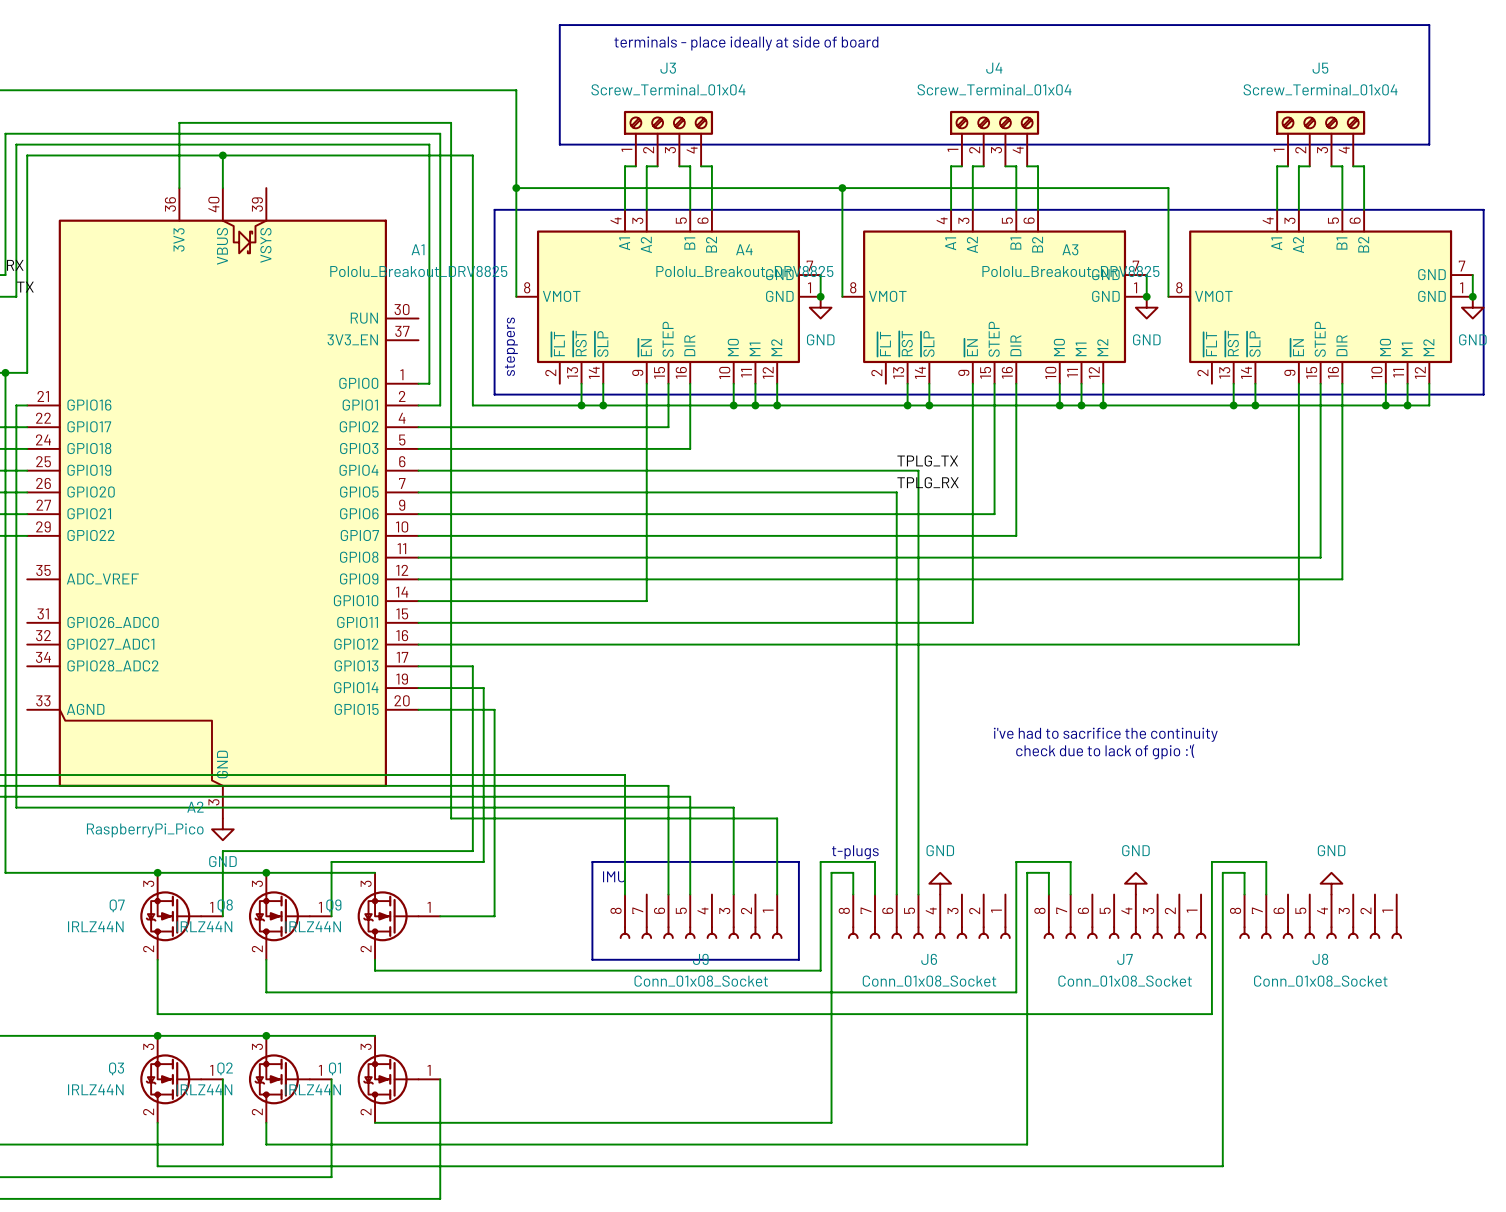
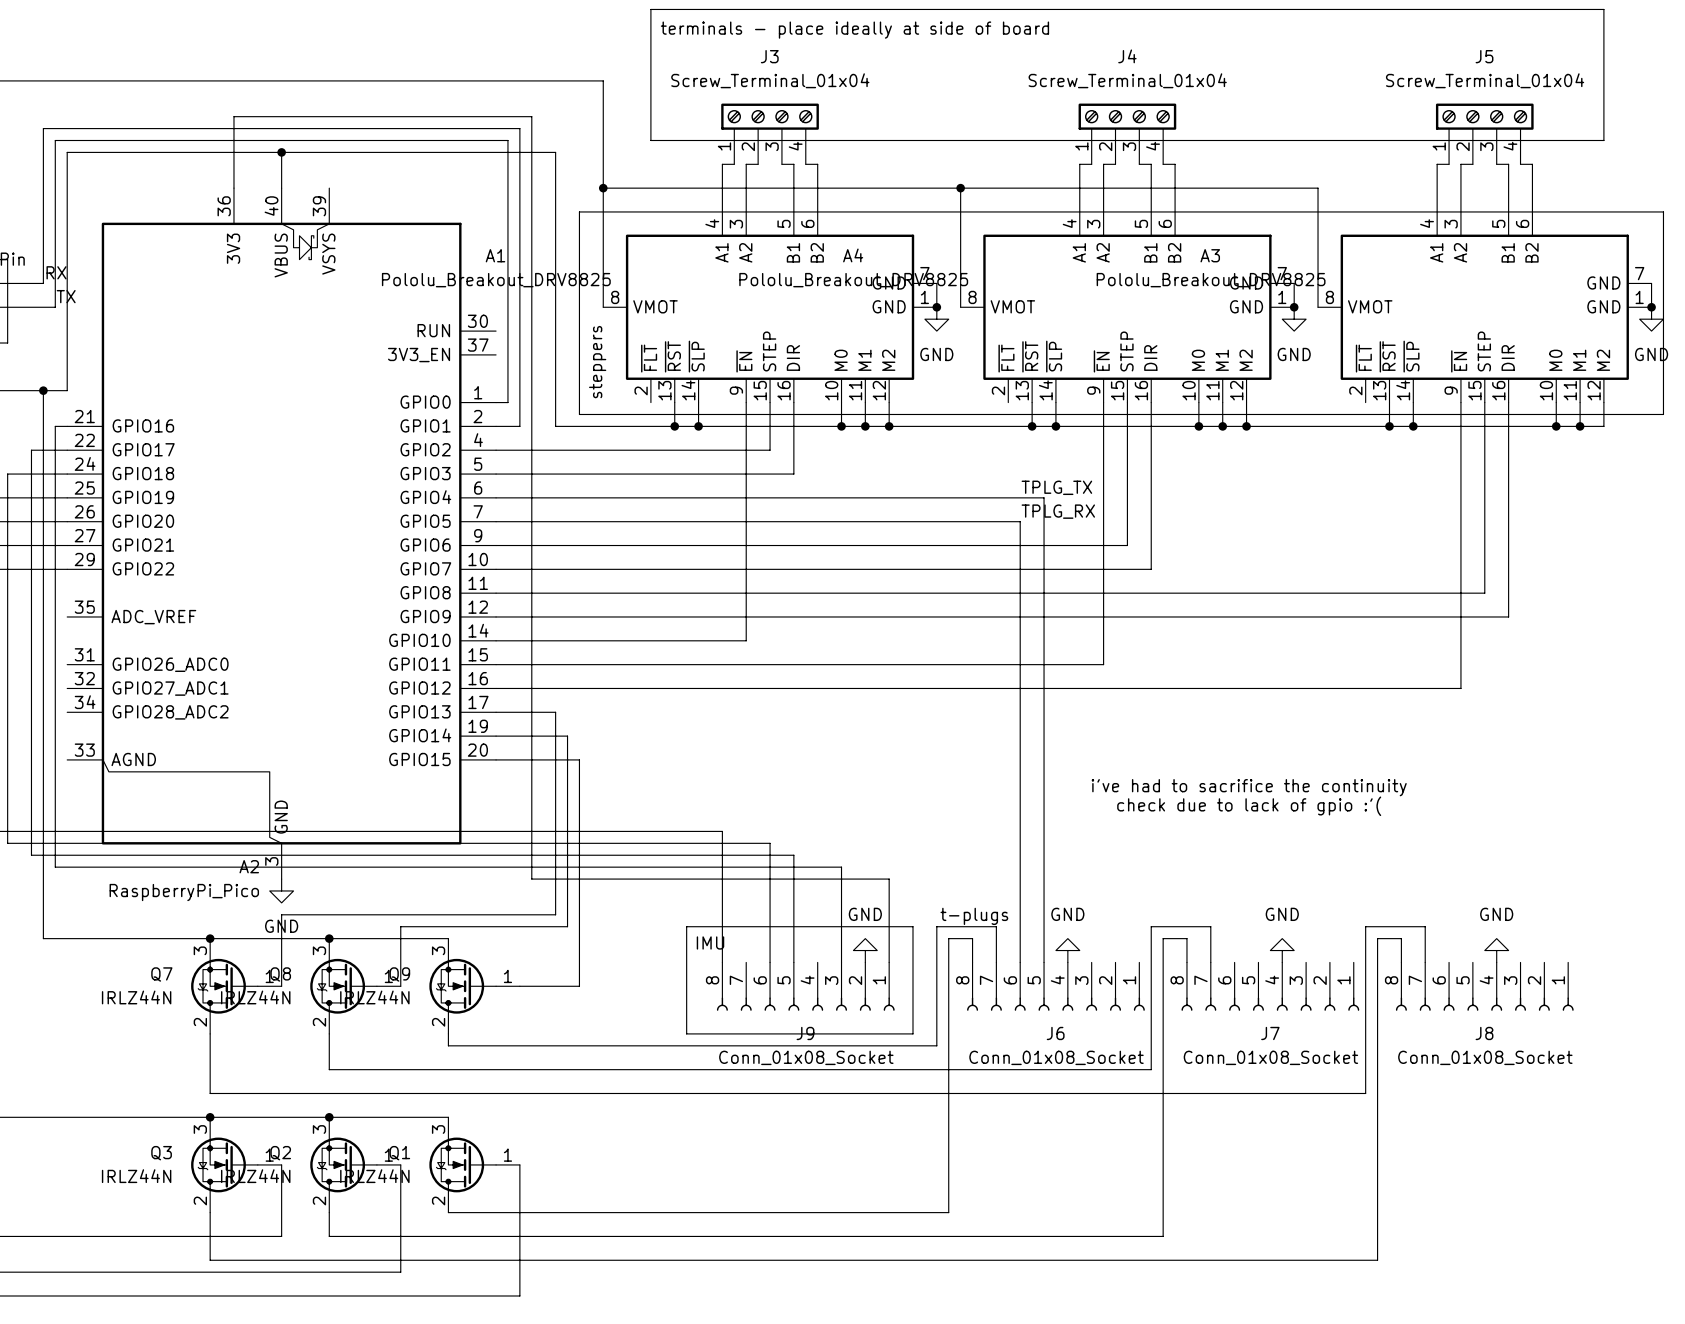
power symbol: none -> GND (865, 950)

